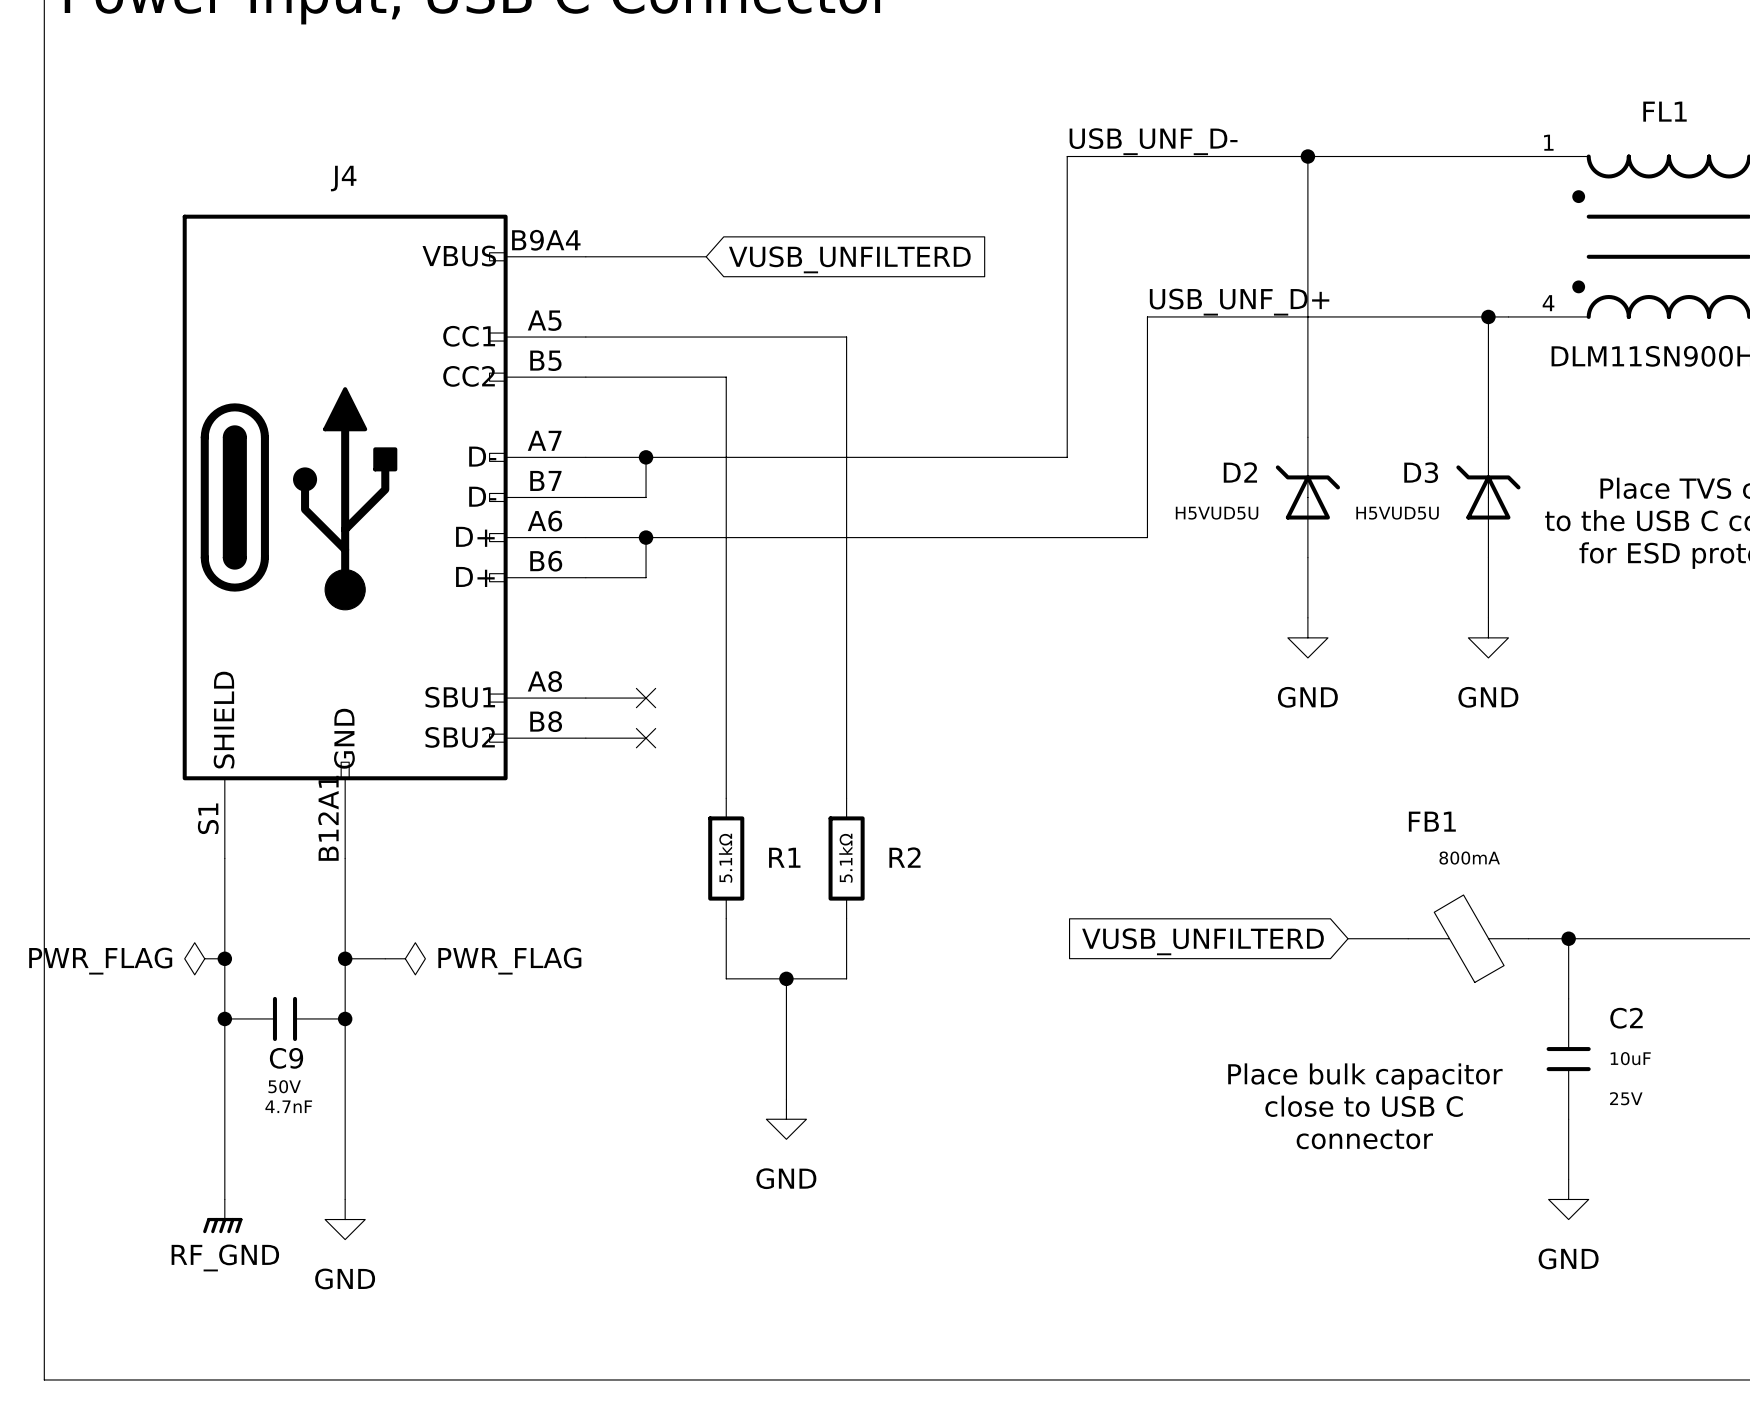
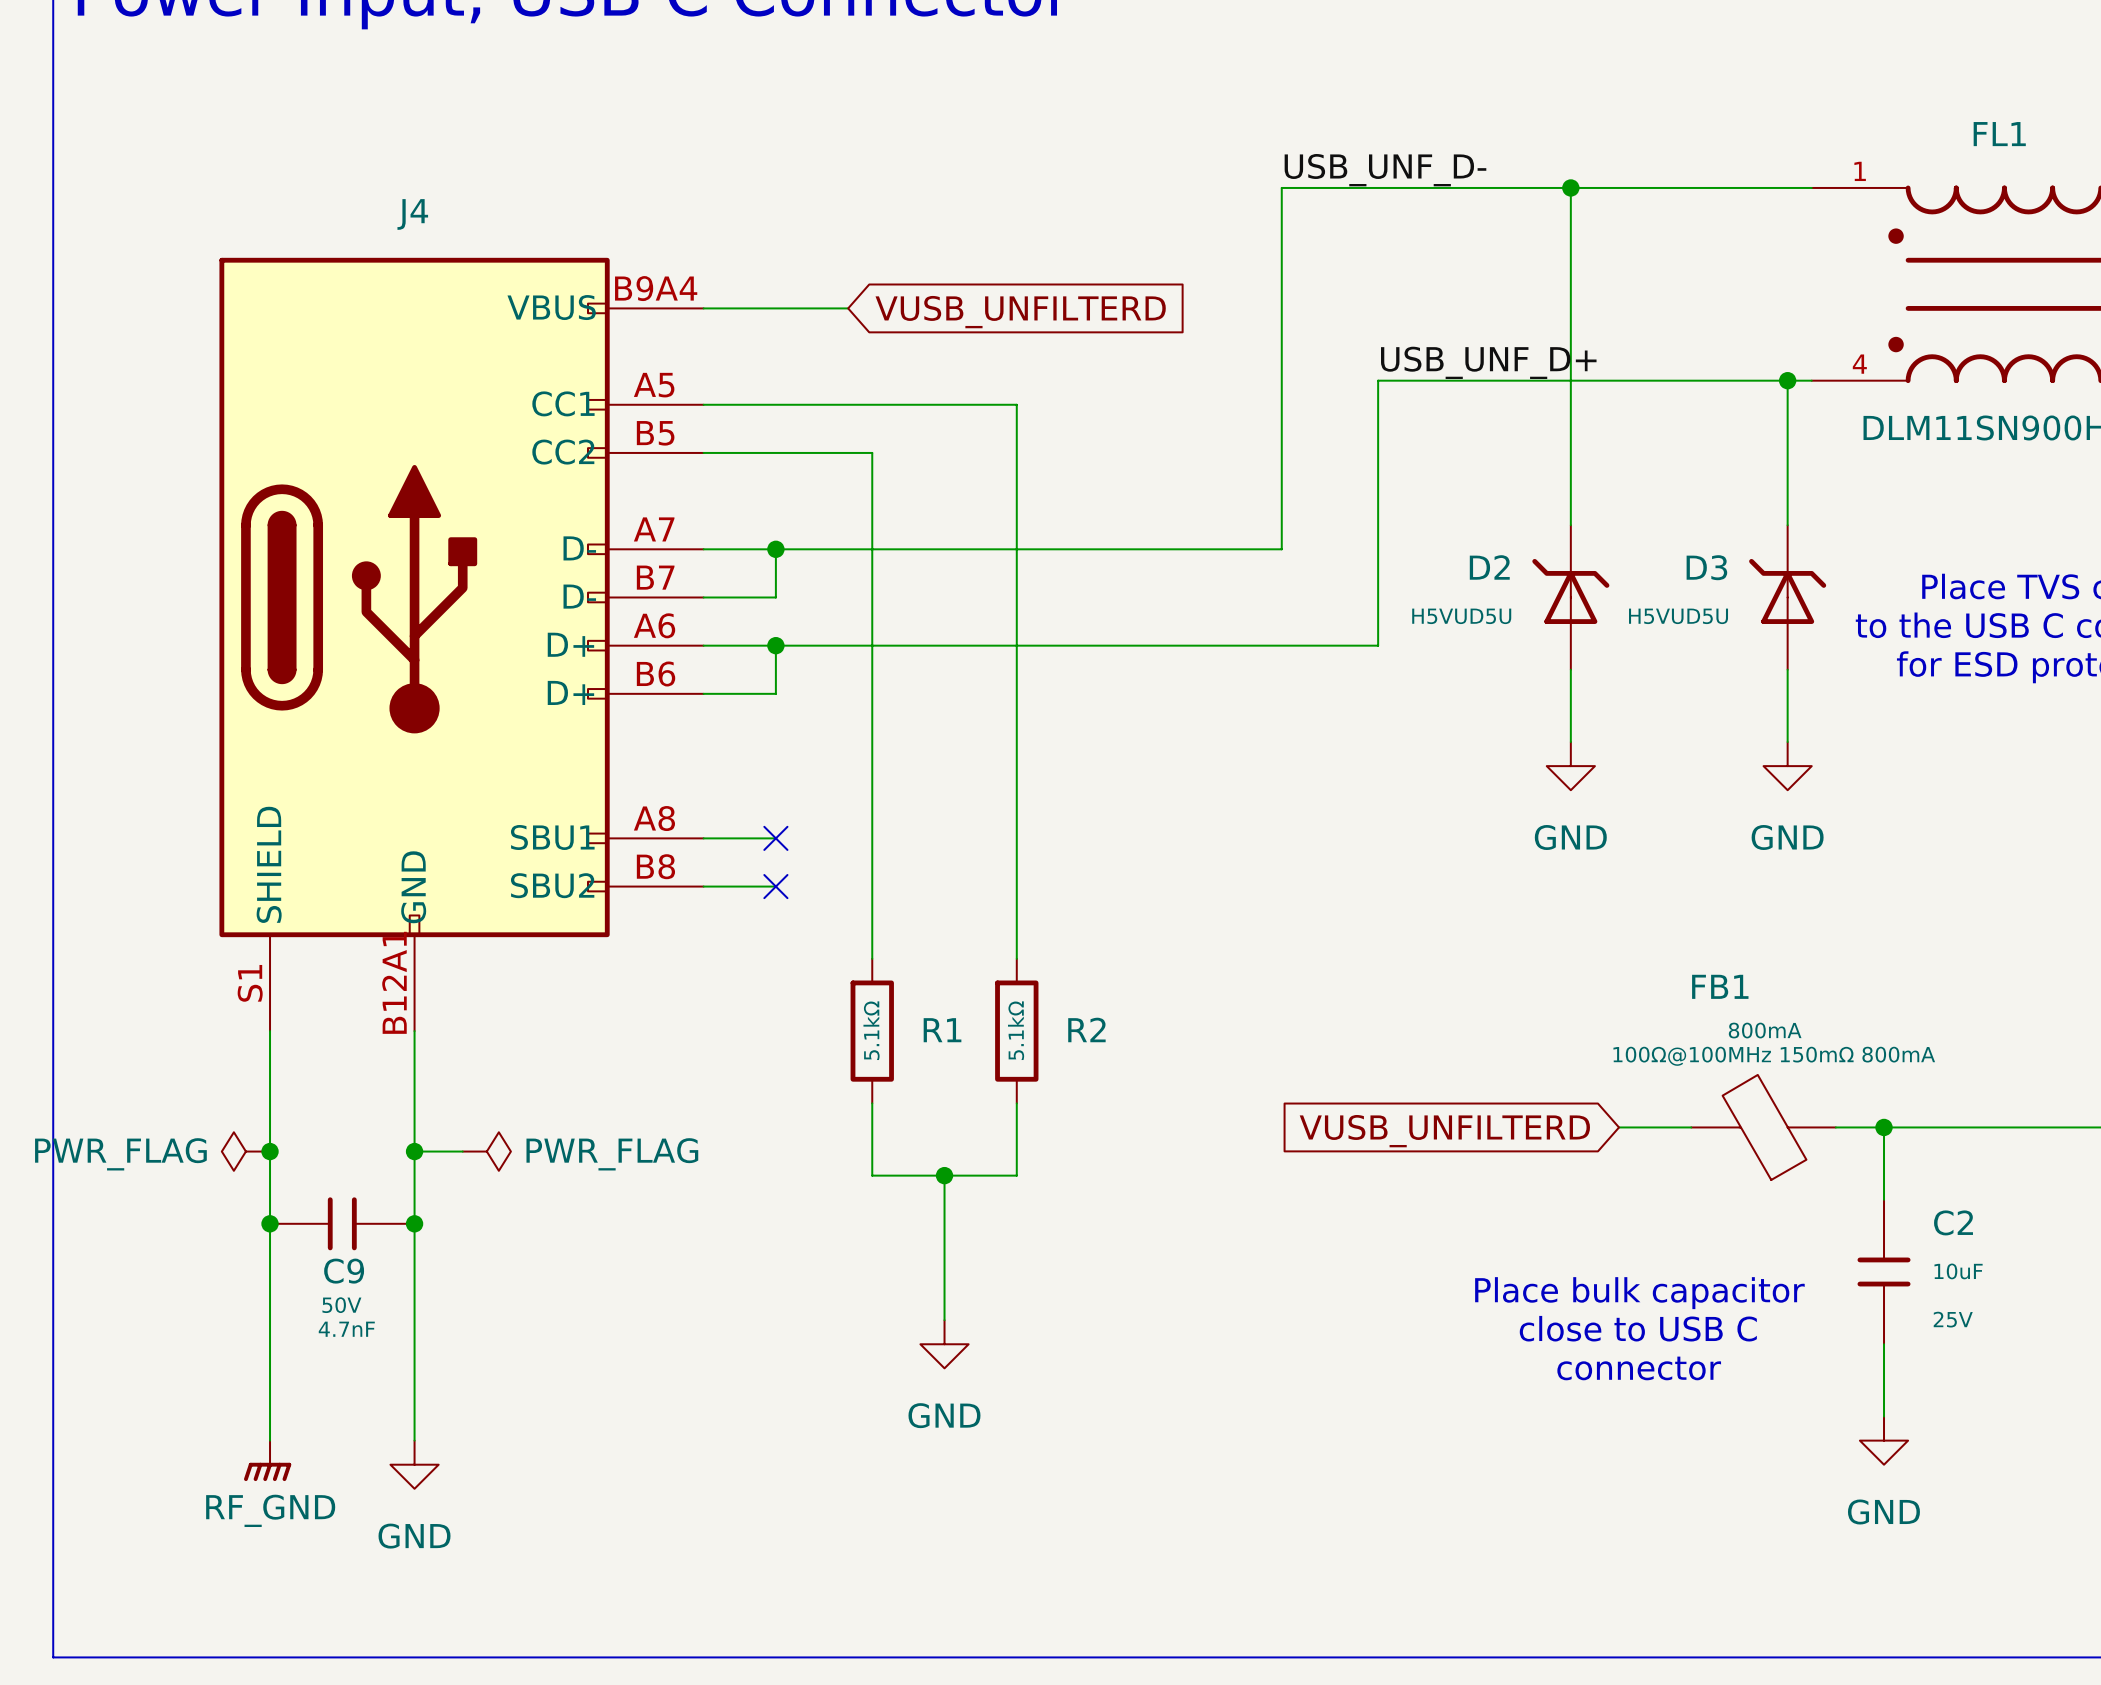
FB1 value: none -> 100Ω@100MHz 150mΩ 800mA (1774, 1056)

